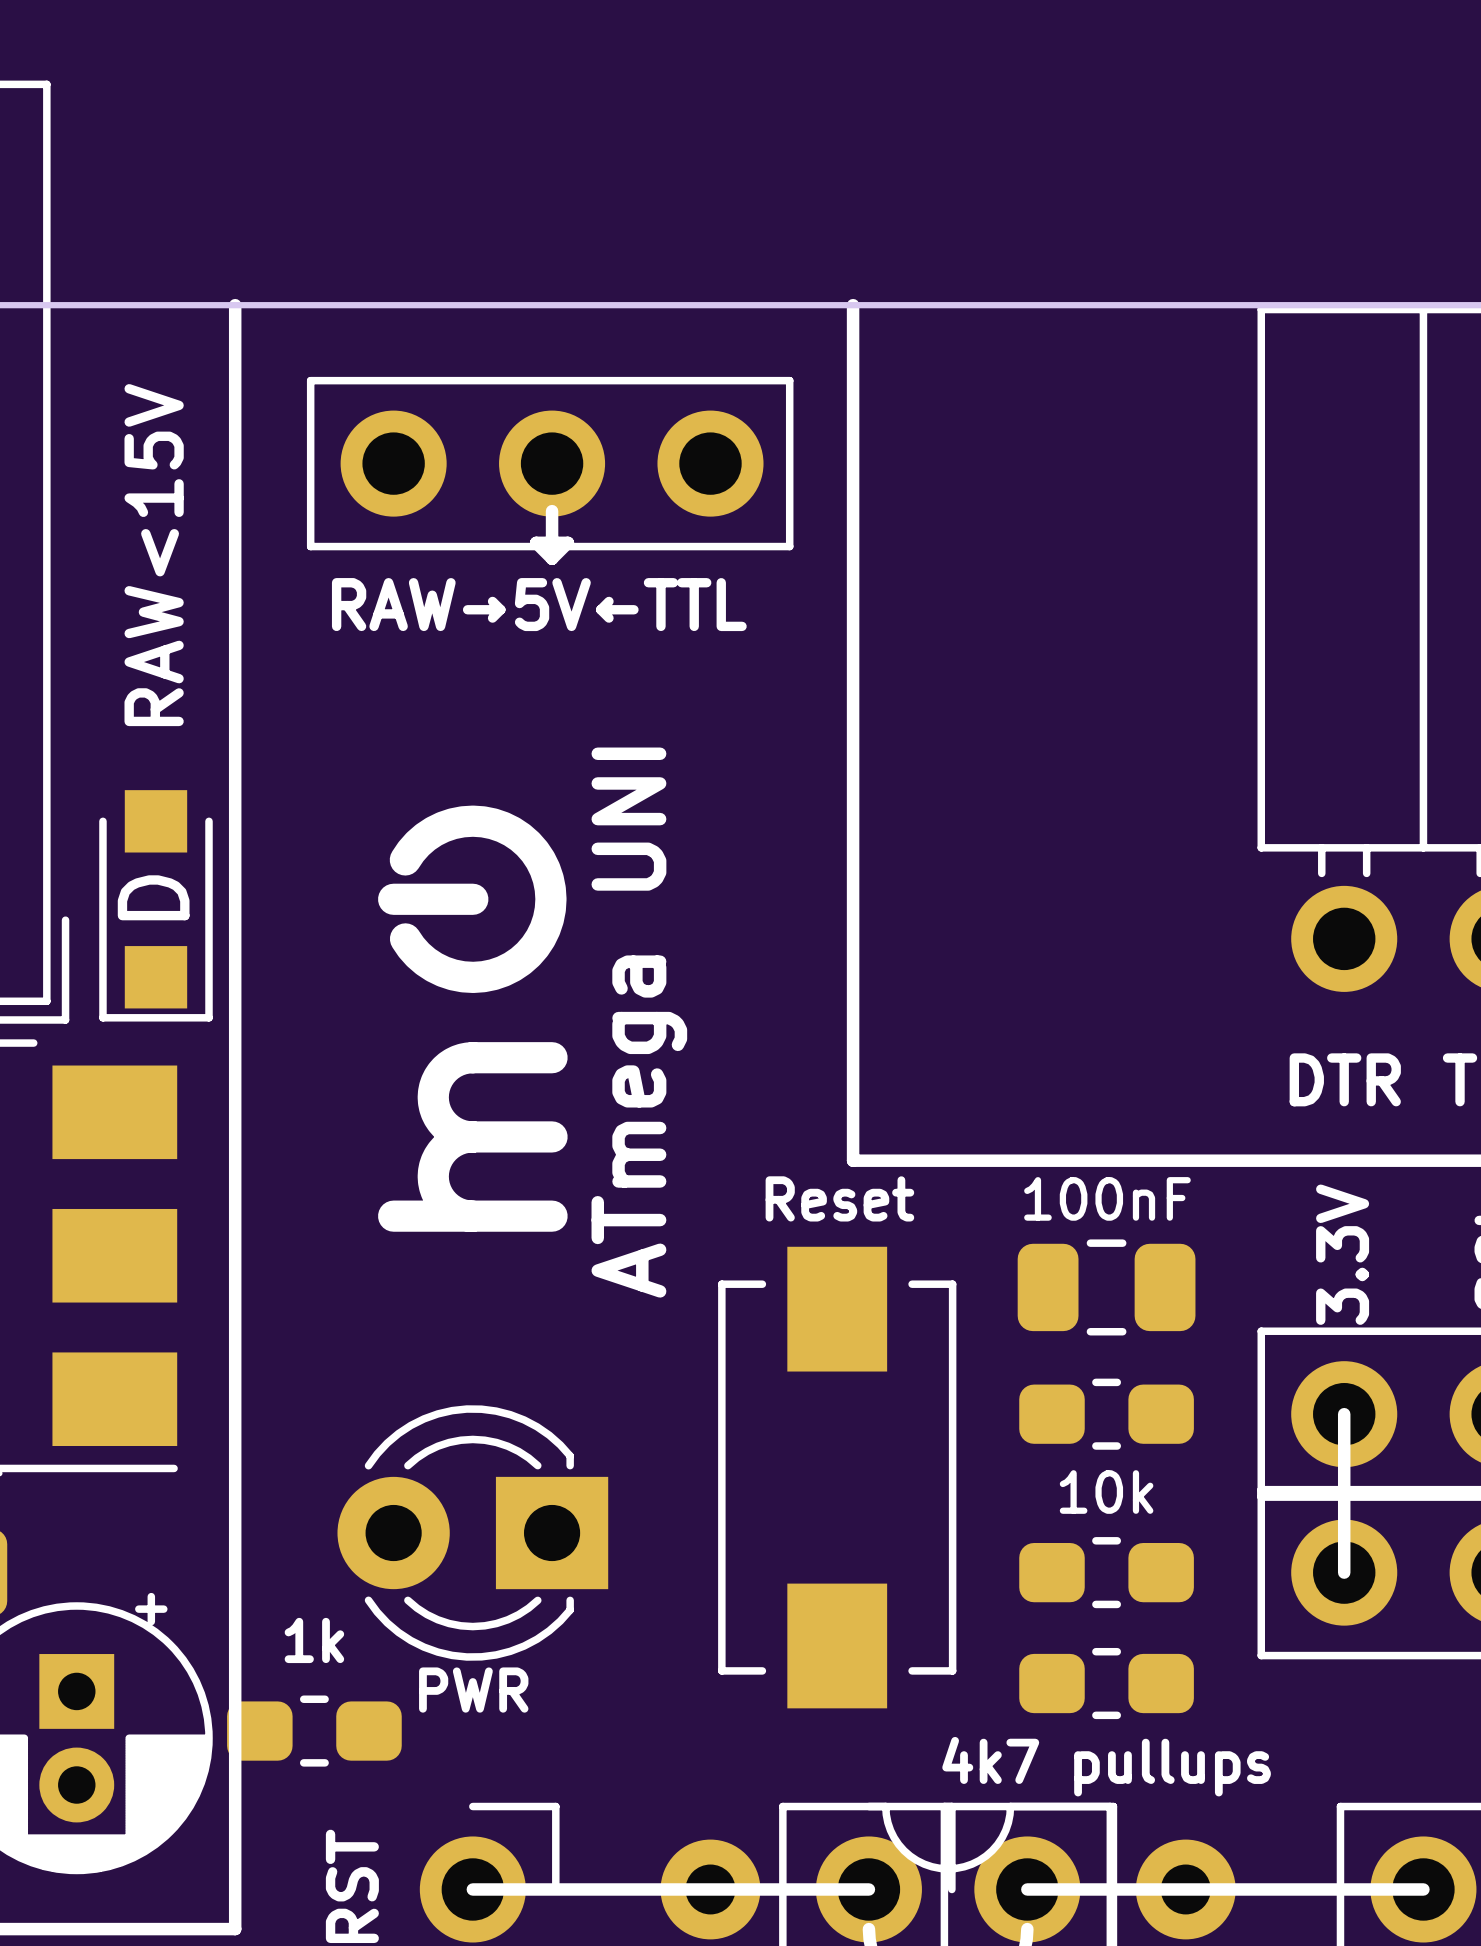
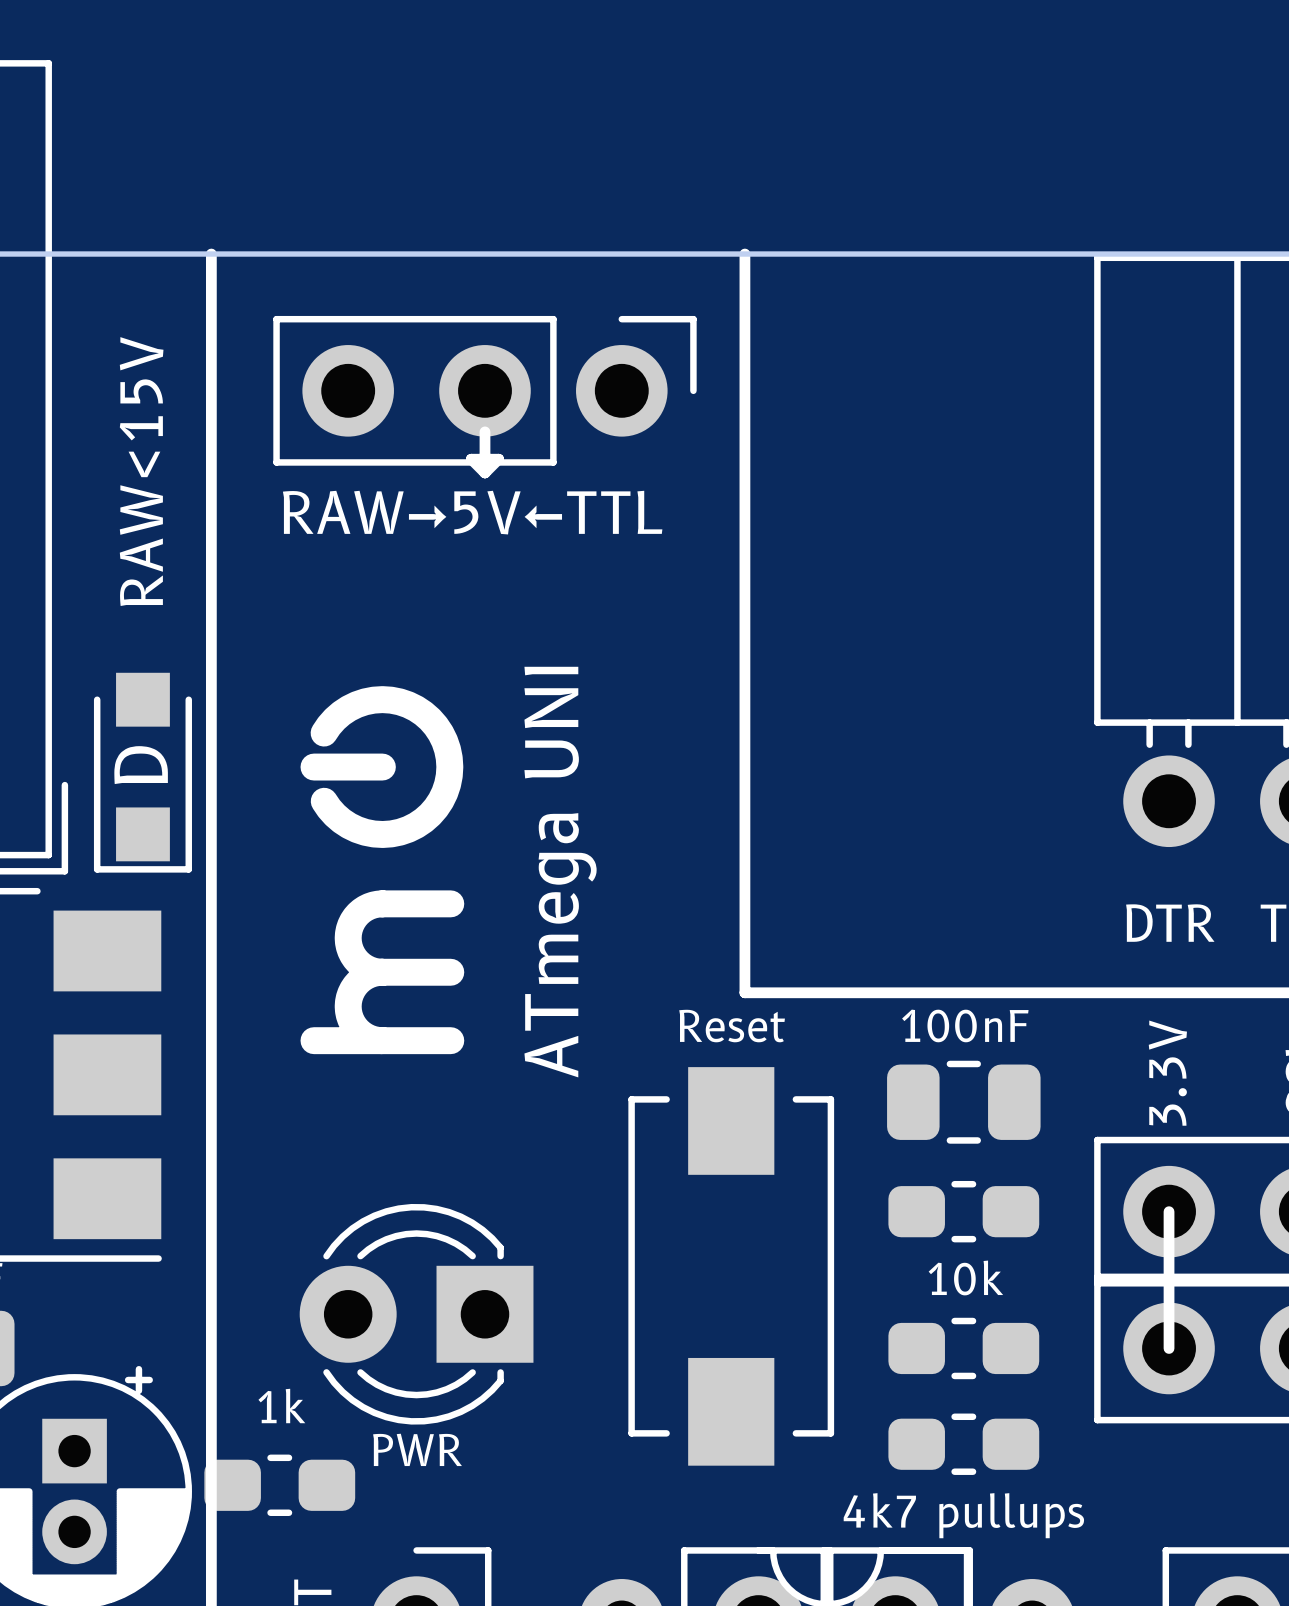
part footprint: [306, 376, 794, 551] -> [273, 315, 697, 466]
part value: none -> RAW→5V←TTL (472, 512)
text: RAW→5V←TTL (539, 604) -> none
drawing position: (472, 1018) -> (382, 870)

